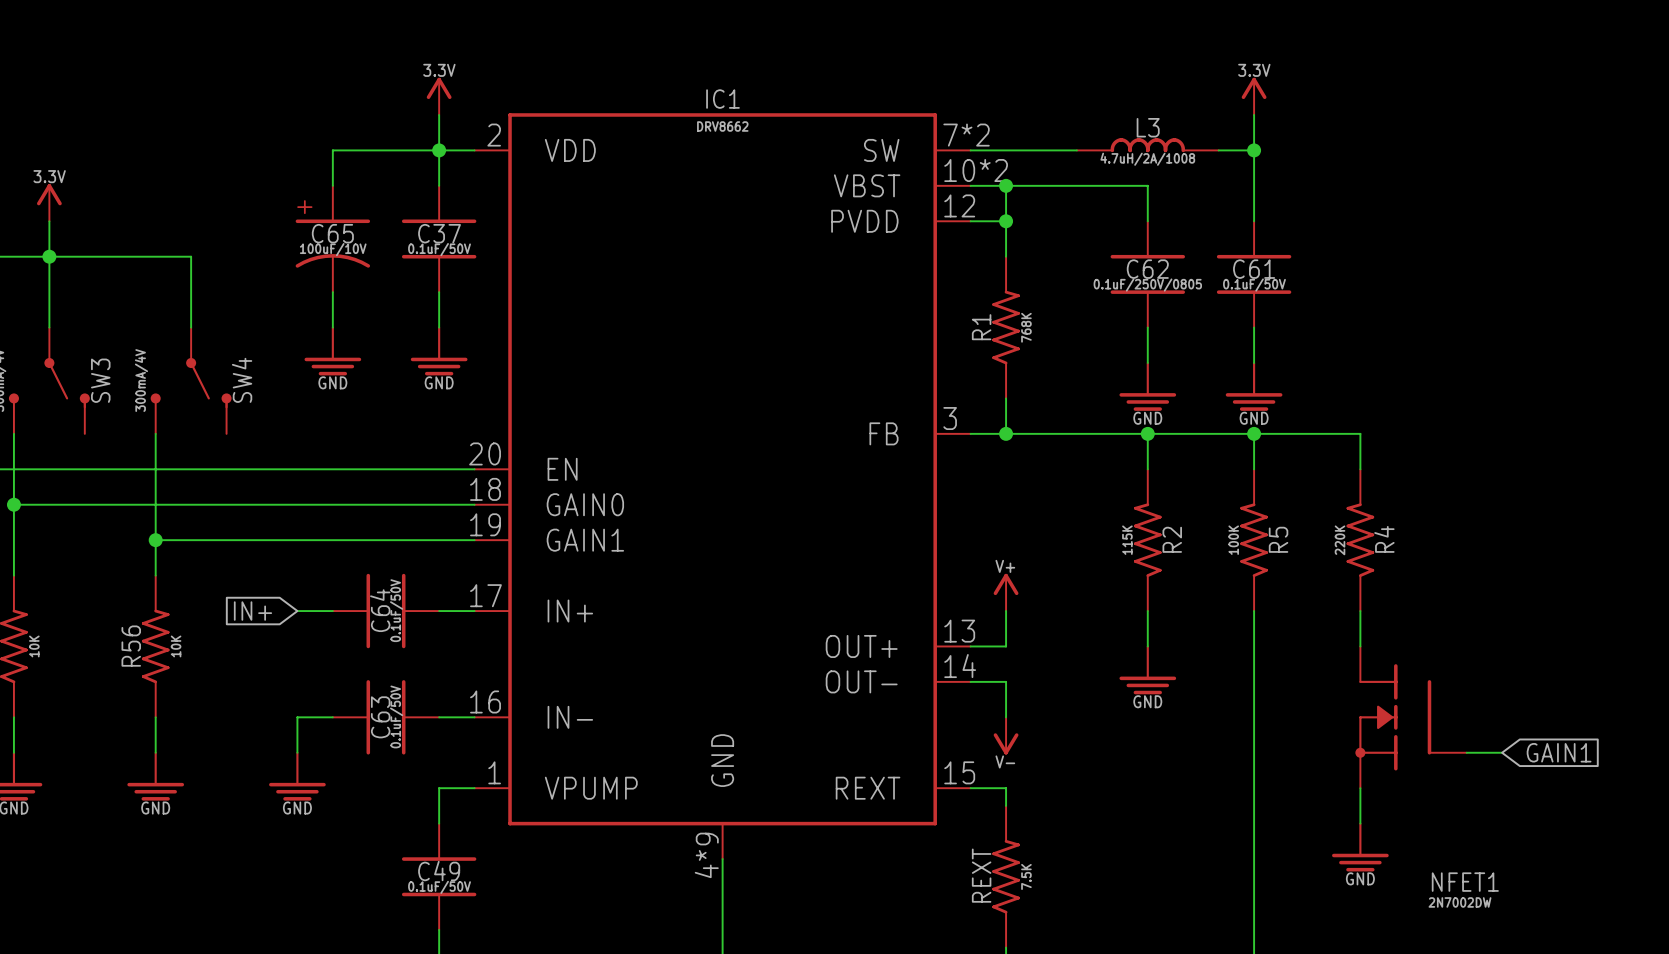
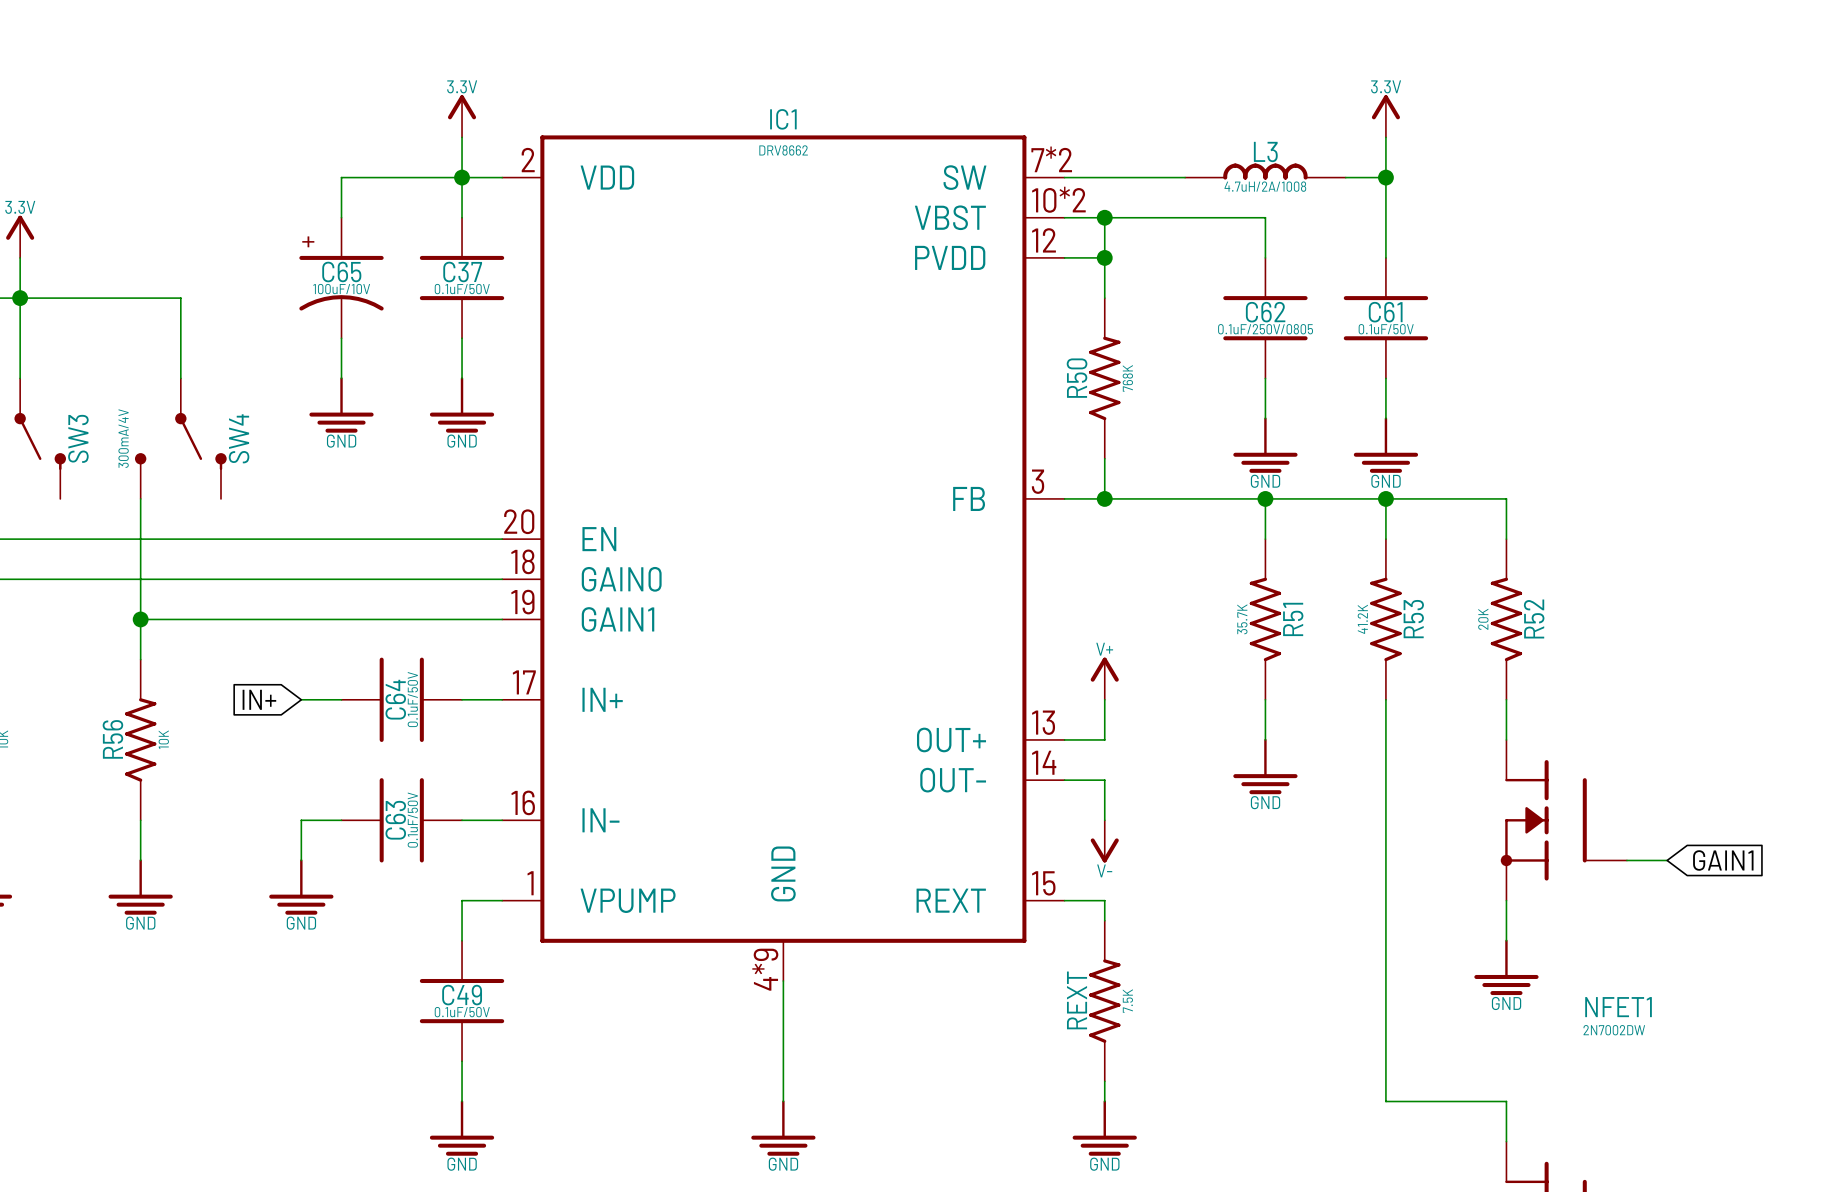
R1 name: R1 (981, 327) -> R50 (1077, 378)
R2 name: R2 (1172, 539) -> R51 (1293, 619)
R5 name: R5 (1278, 539) -> R53 (1413, 619)
R4 name: R4 (1384, 539) -> R52 (1534, 618)
R2 value: 115K (1127, 540) -> 35.7K (1242, 619)
R5 value: 100K (1233, 540) -> 41.2K (1362, 619)
R4 value: 220K (1340, 540) -> 20K (1483, 619)

